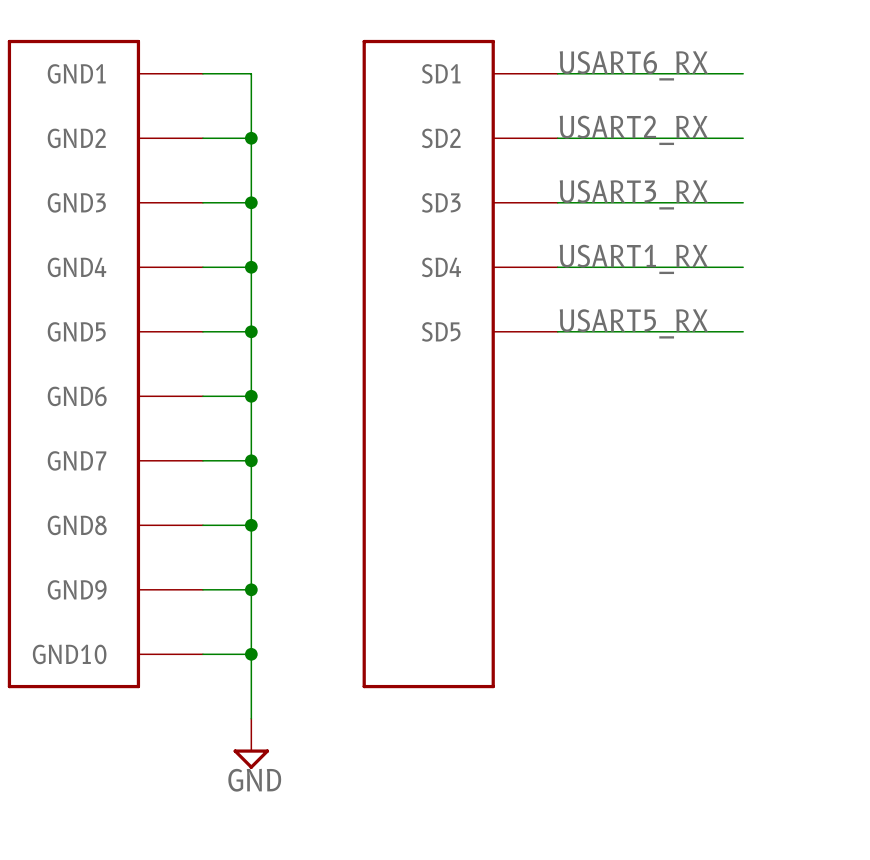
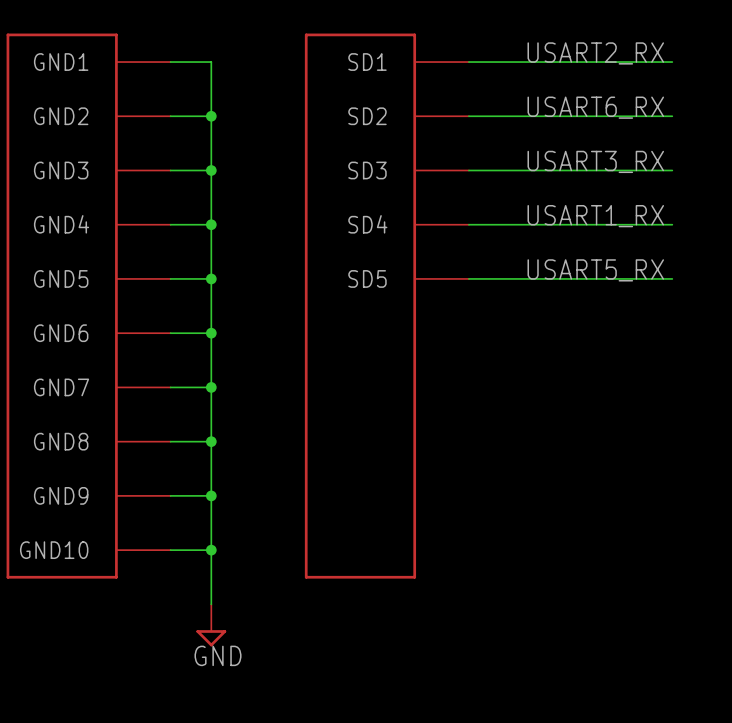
label position: USART6_RX (633, 65) -> USART6_RX (595, 107)
wire: none -> (624, 62) (672, 62)
label position: USART2_RX (633, 130) -> USART2_RX (595, 53)
wire: none -> (624, 116) (672, 116)
label position: USART3_RX (633, 194) -> USART3_RX (595, 161)
wire: none -> (624, 170) (672, 170)
label position: USART1_RX (633, 259) -> USART1_RX (595, 216)
wire: none -> (624, 224) (672, 224)
label position: USART5_RX (633, 323) -> USART5_RX (595, 270)
wire: none -> (624, 278) (672, 278)

